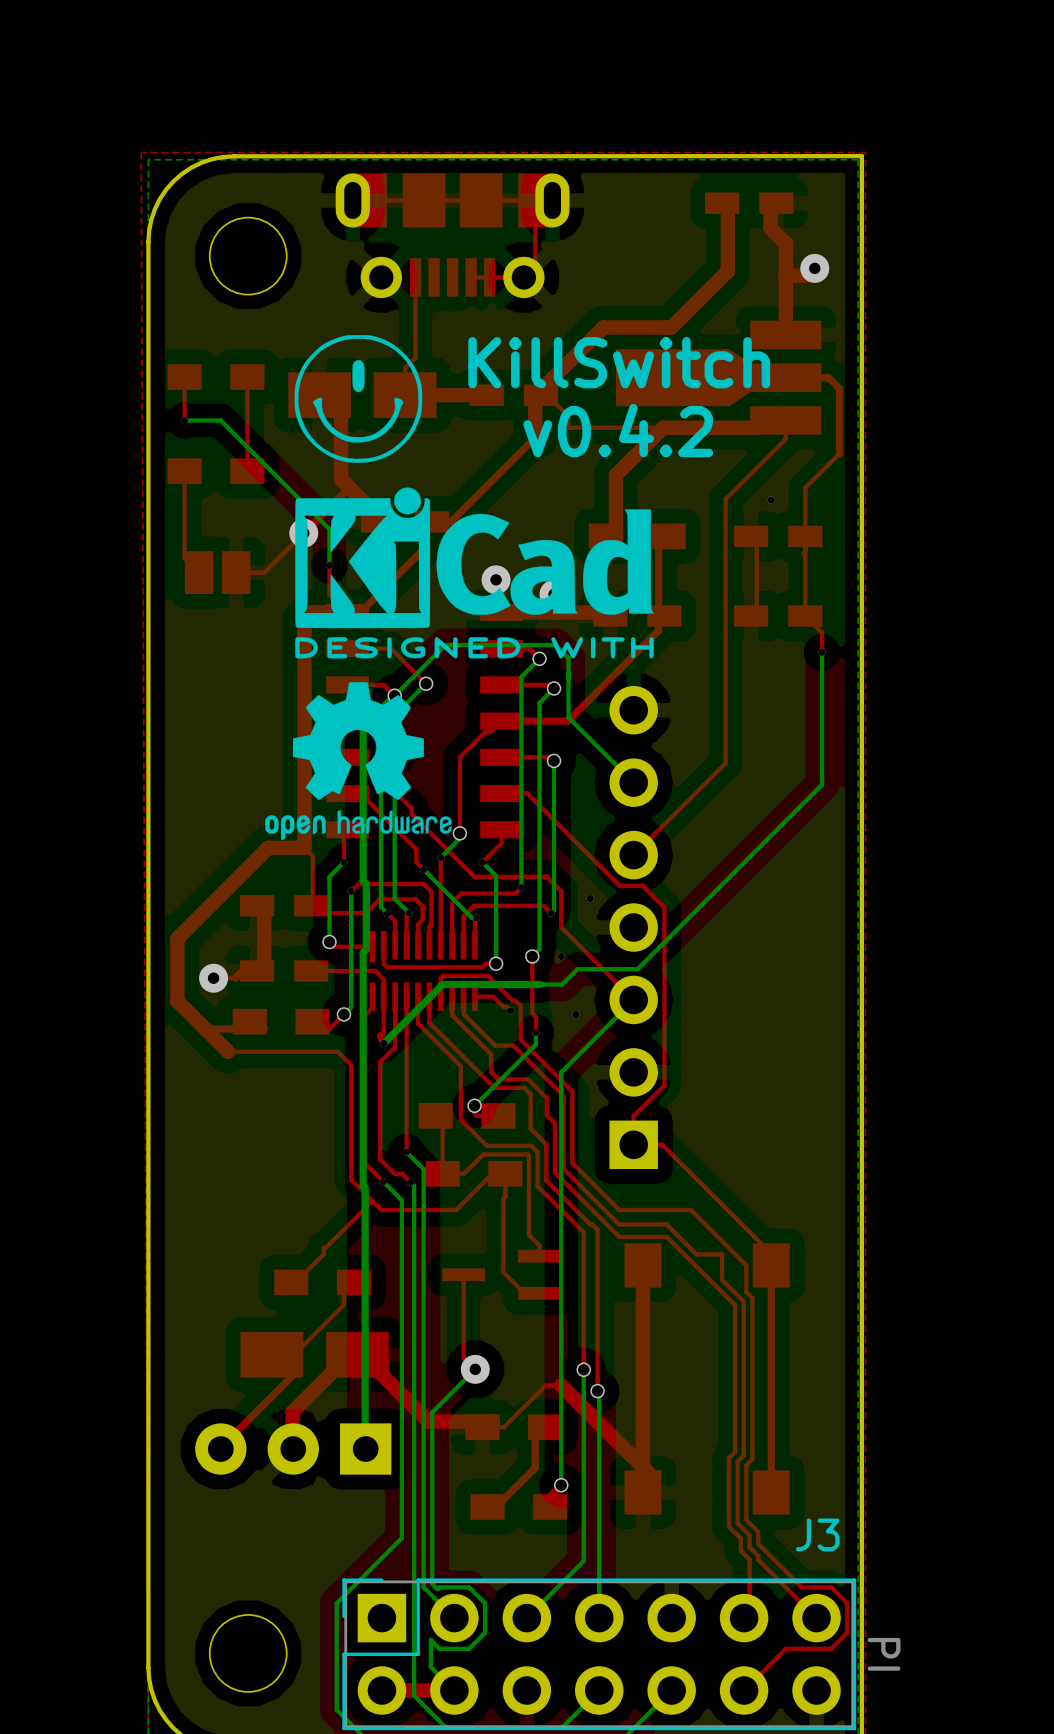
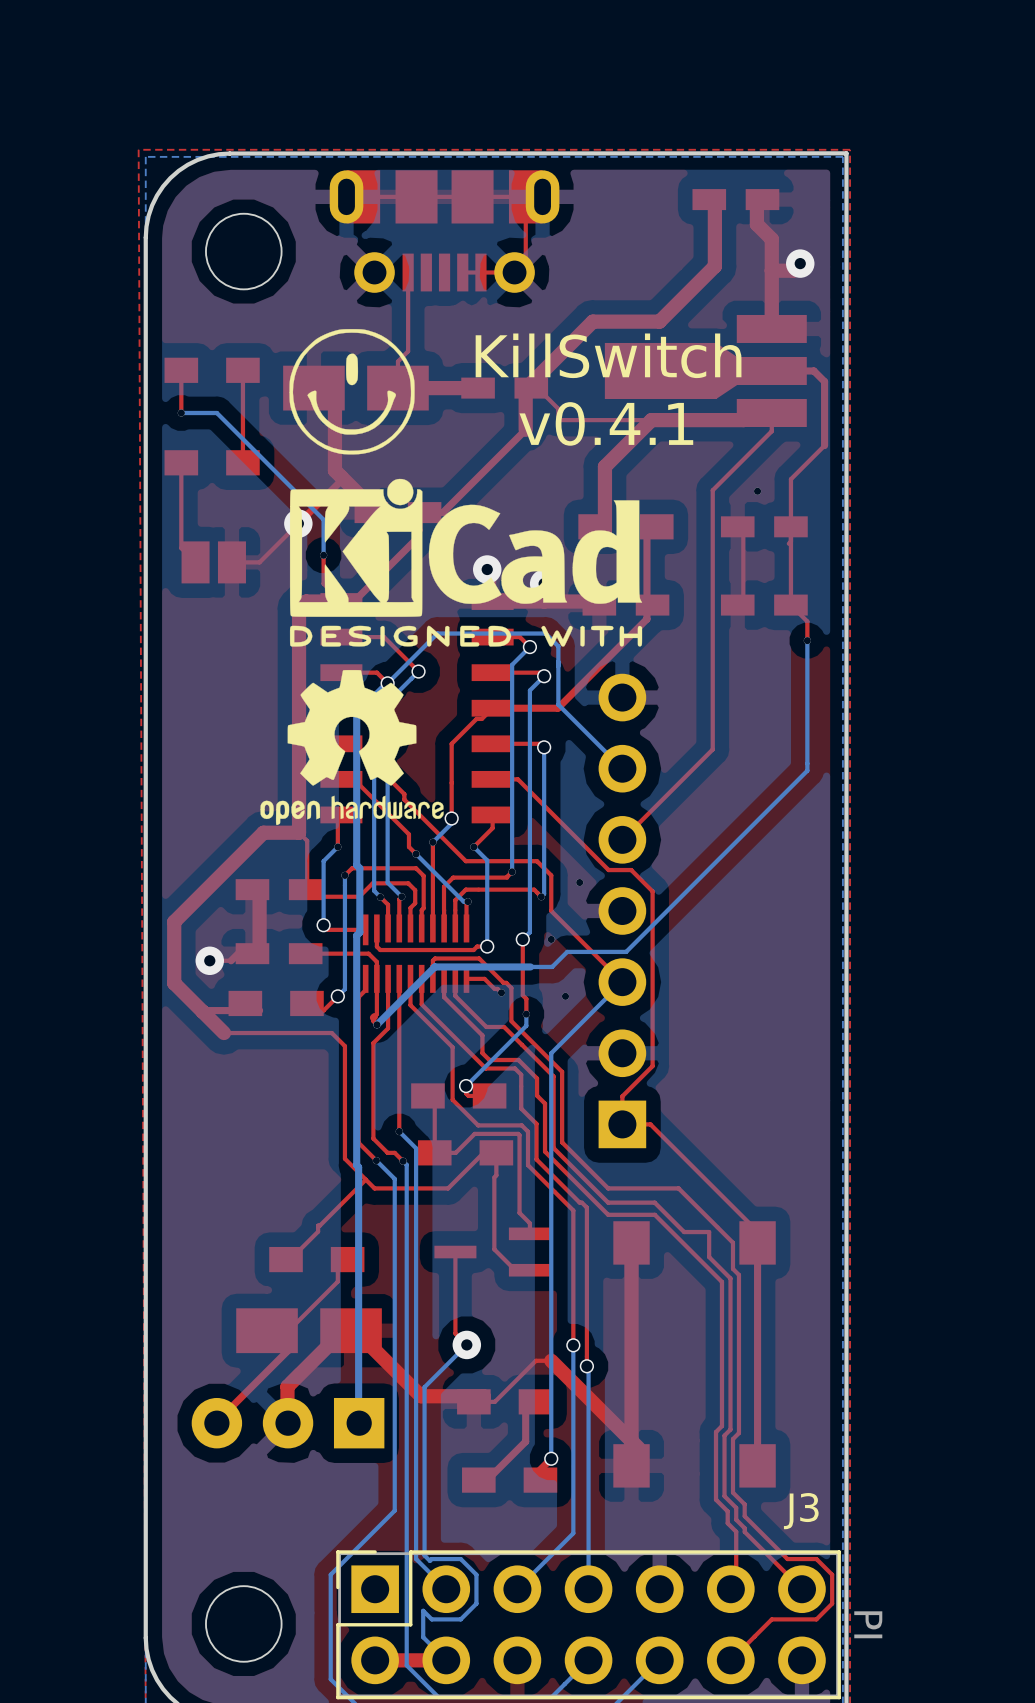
text: v0.4.2 (618, 430) -> v0.4.1 (606, 423)

